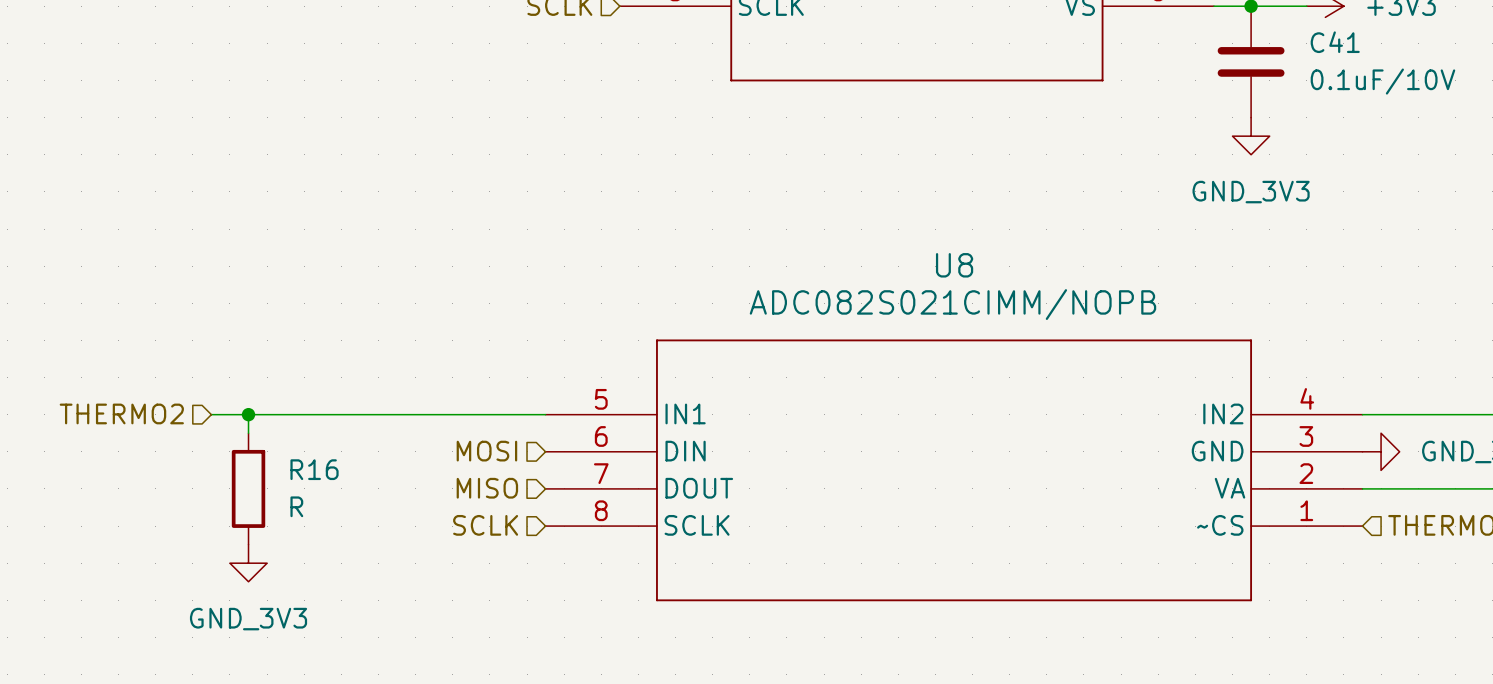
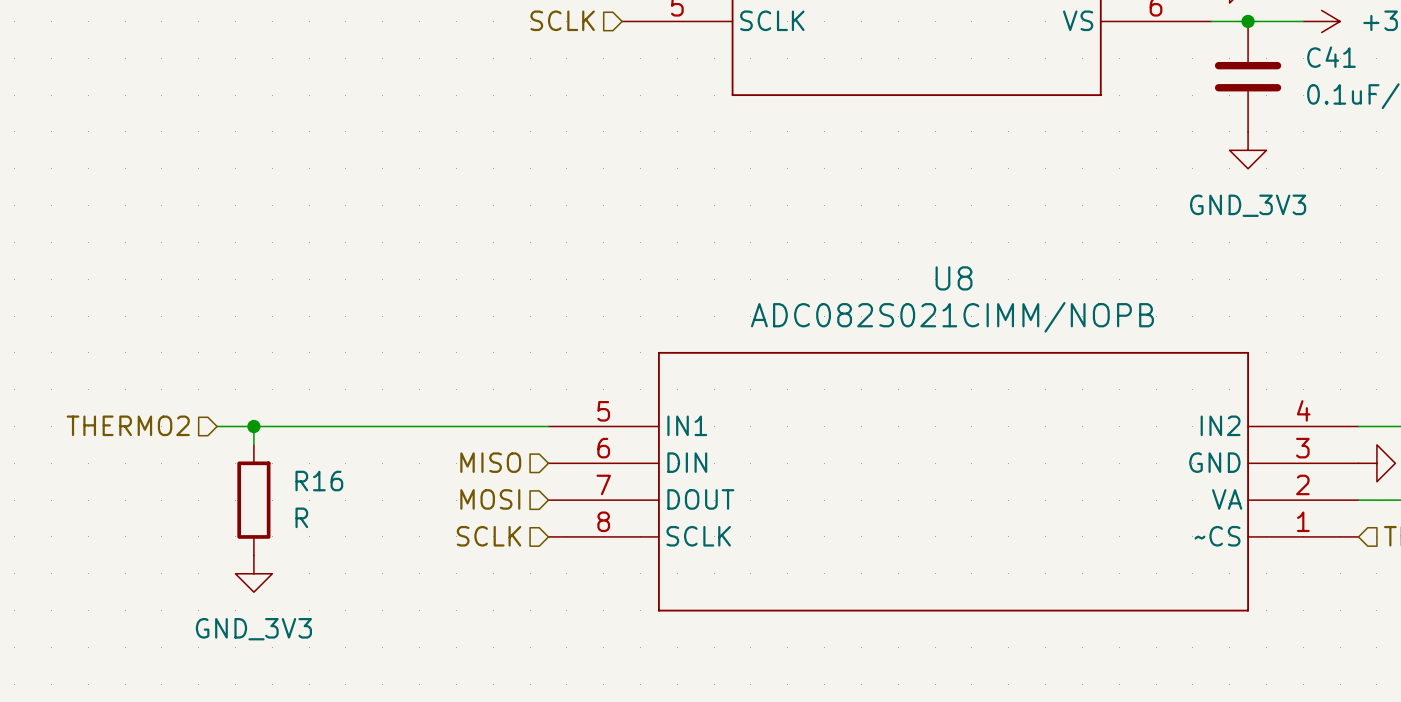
hierarchical label: MOSI (486, 451) -> MISO (490, 462)
hierarchical label: MISO (487, 488) -> MOSI (490, 499)

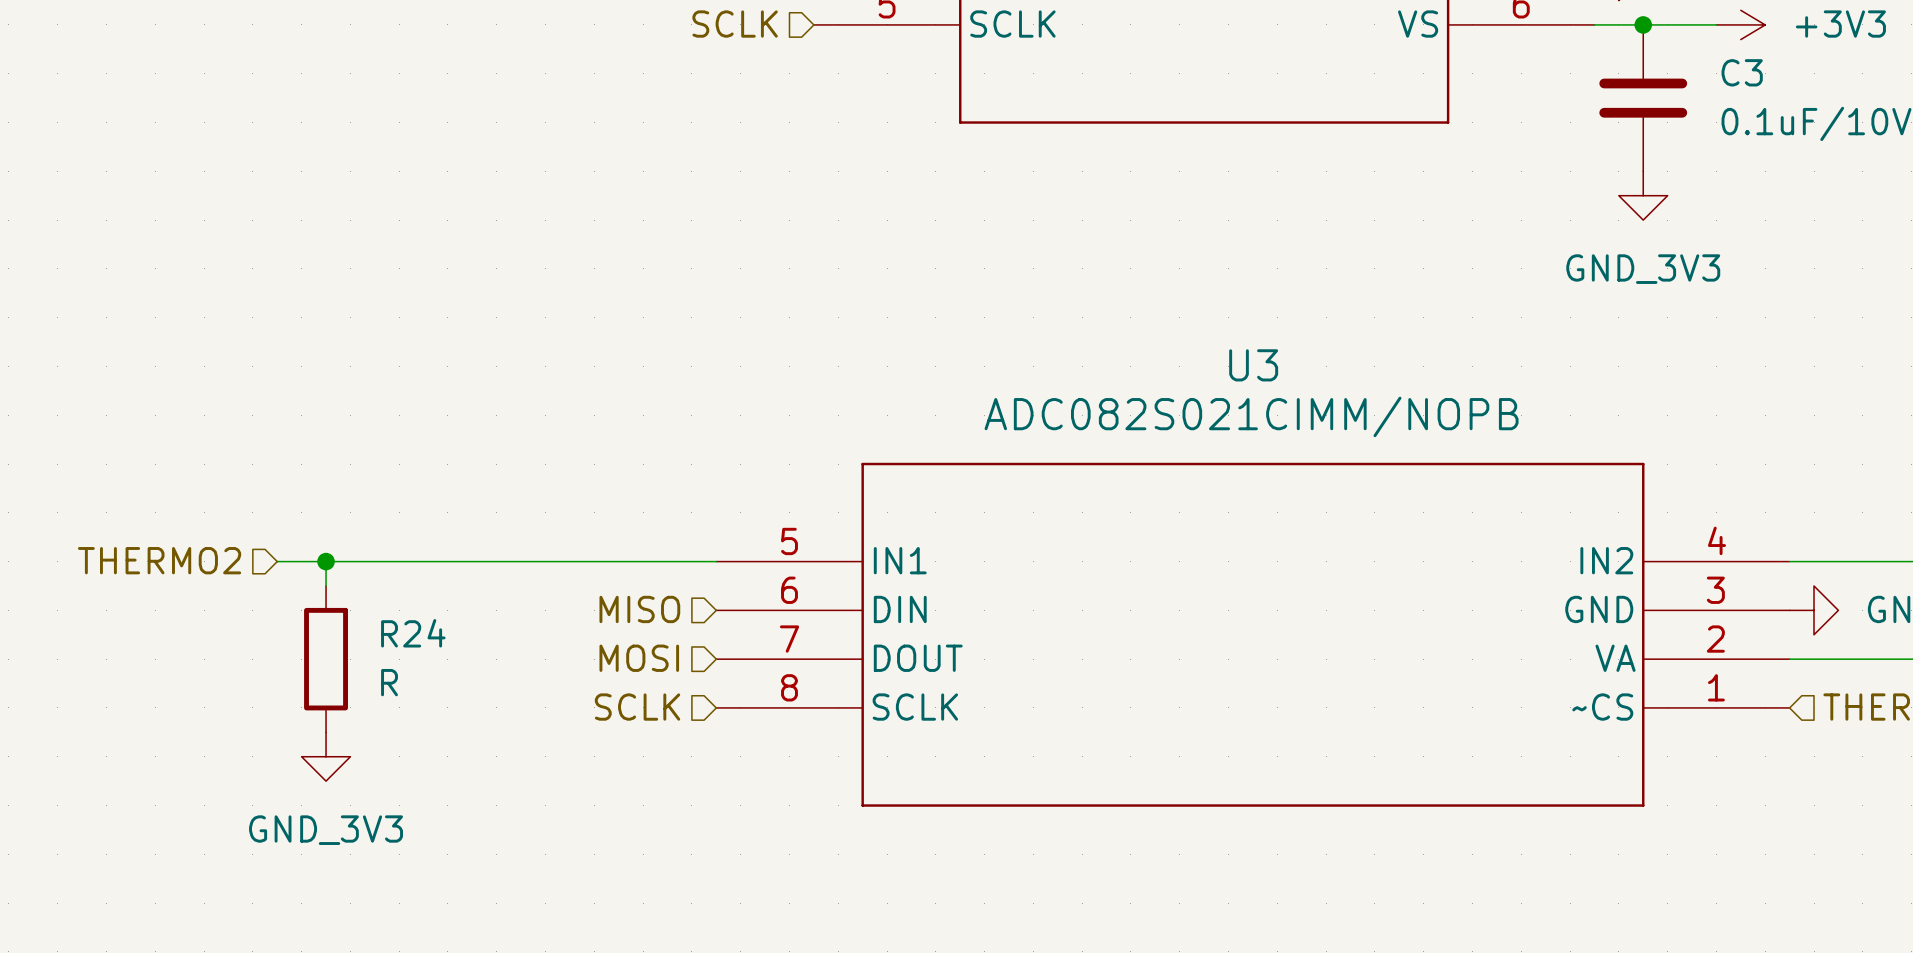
C41 name: C41 (1331, 57) -> C3 (1742, 72)
U8 name: U8 (954, 278) -> U3 (1253, 365)
R16 name: R16 (319, 481) -> R24 (413, 633)

